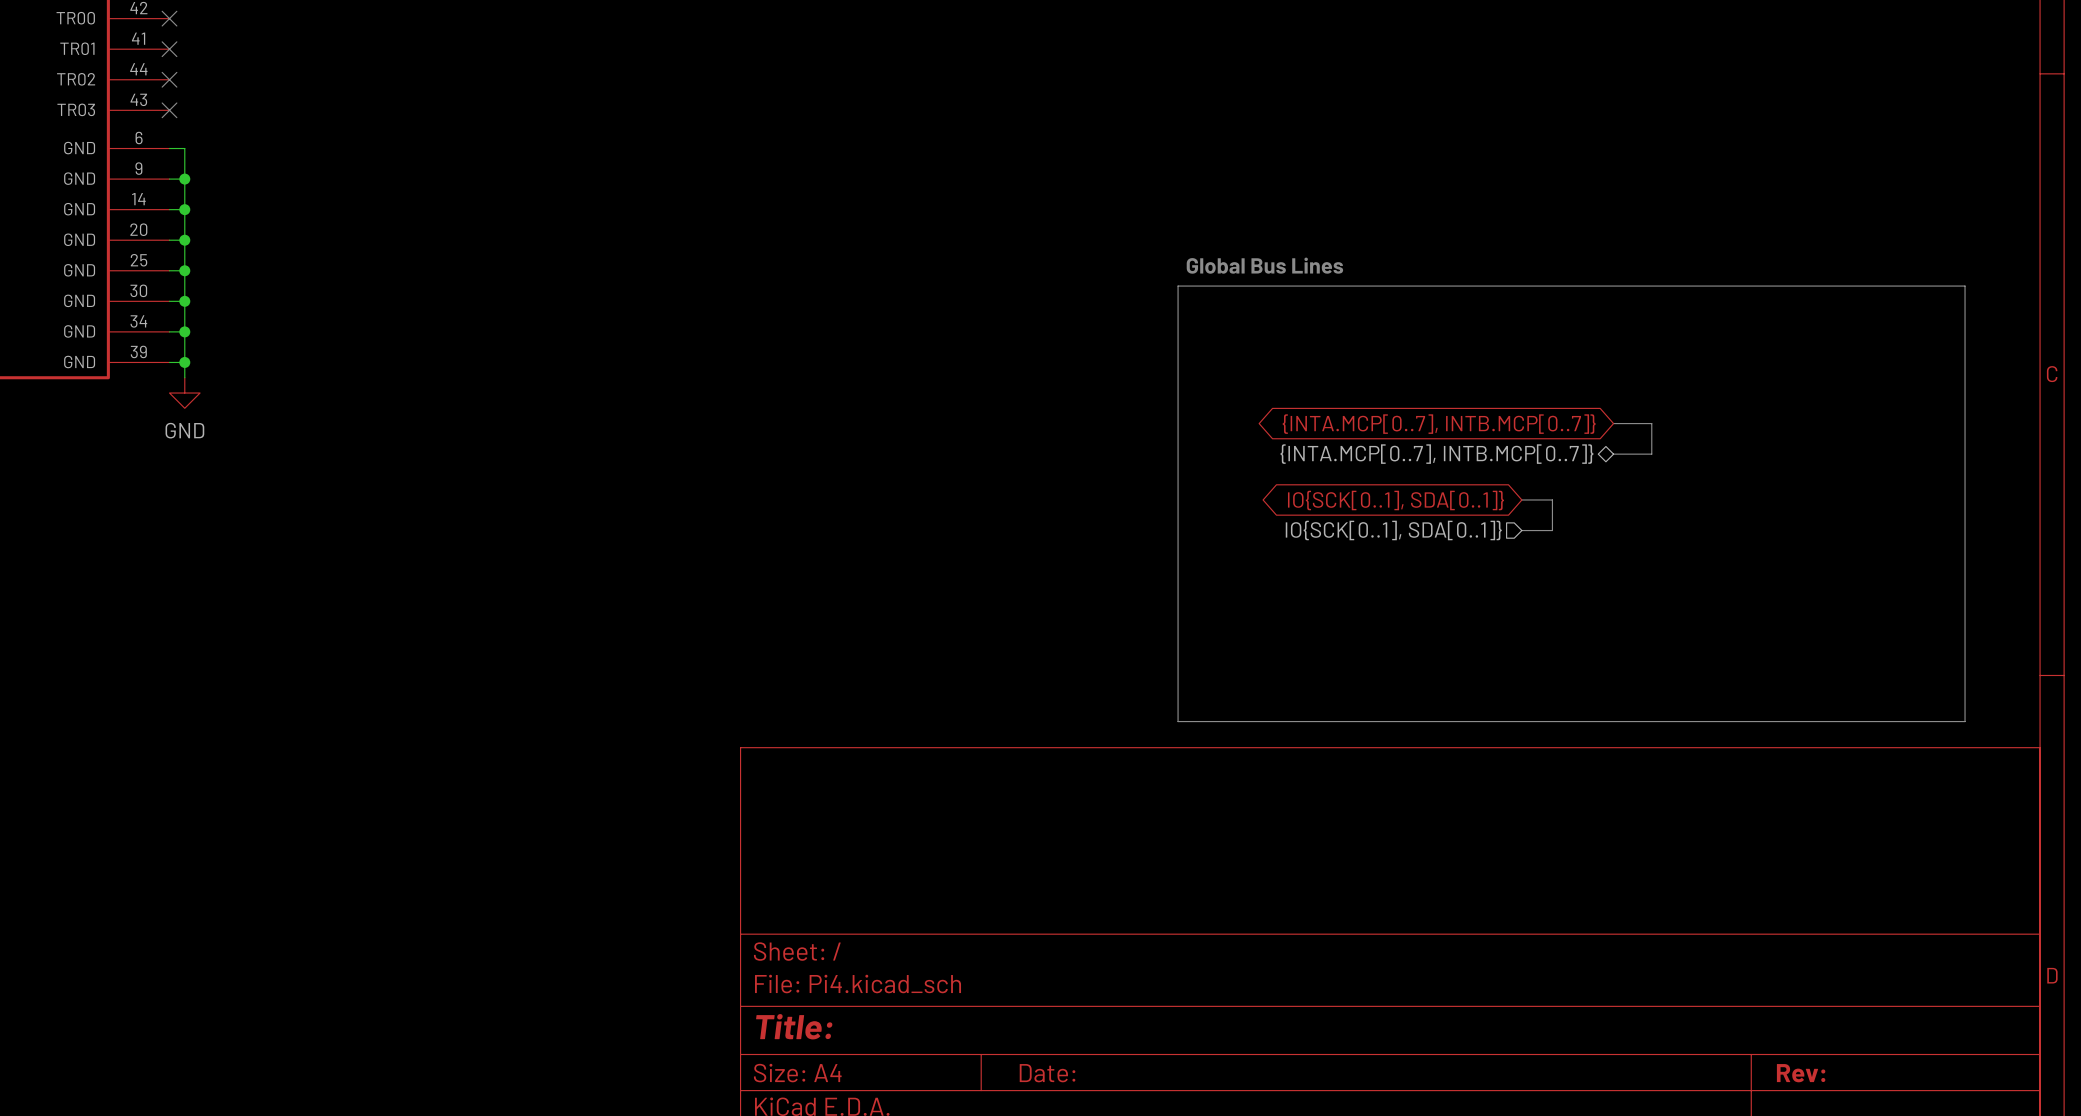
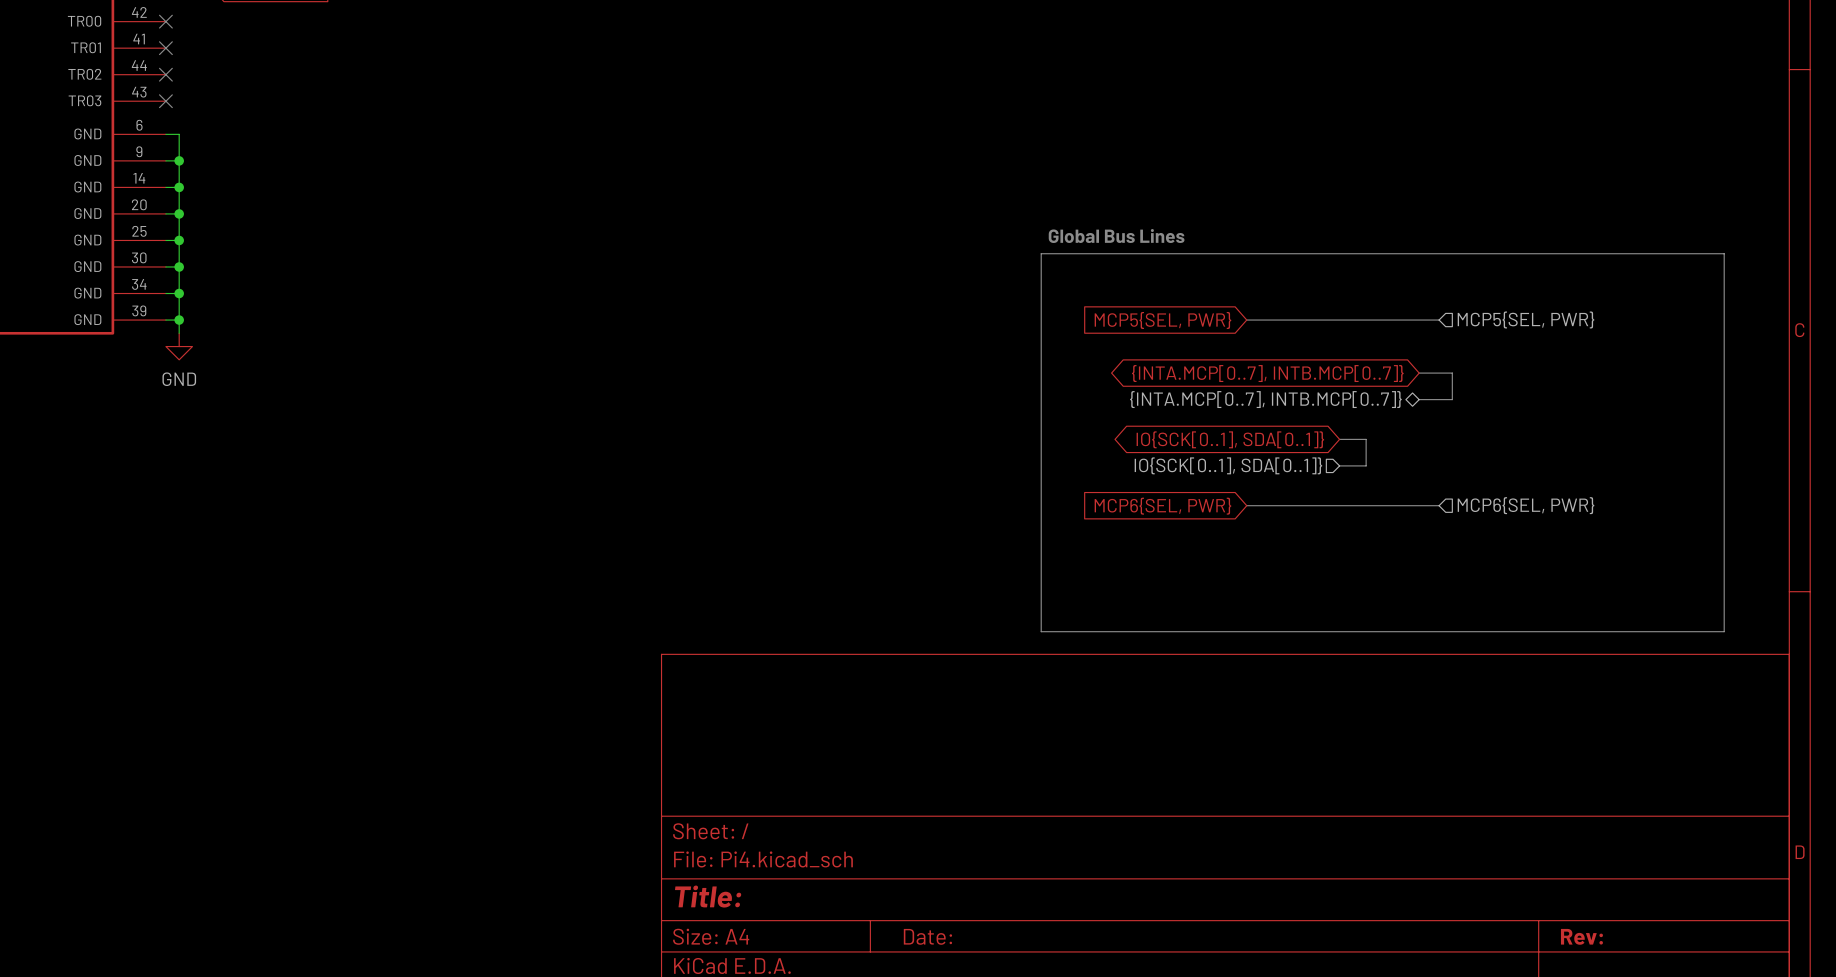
global label: none -> MCP5{SEL, PWR} (1162, 320)
bus: none -> (1246, 320) (1439, 320)
hierarchical label: none -> MCP5{SEL, PWR} (1525, 319)
global label: none -> MCP6{SEL, PWR} (1162, 506)
bus: none -> (1246, 505) (1439, 505)
hierarchical label: none -> MCP6{SEL, PWR} (1525, 505)

